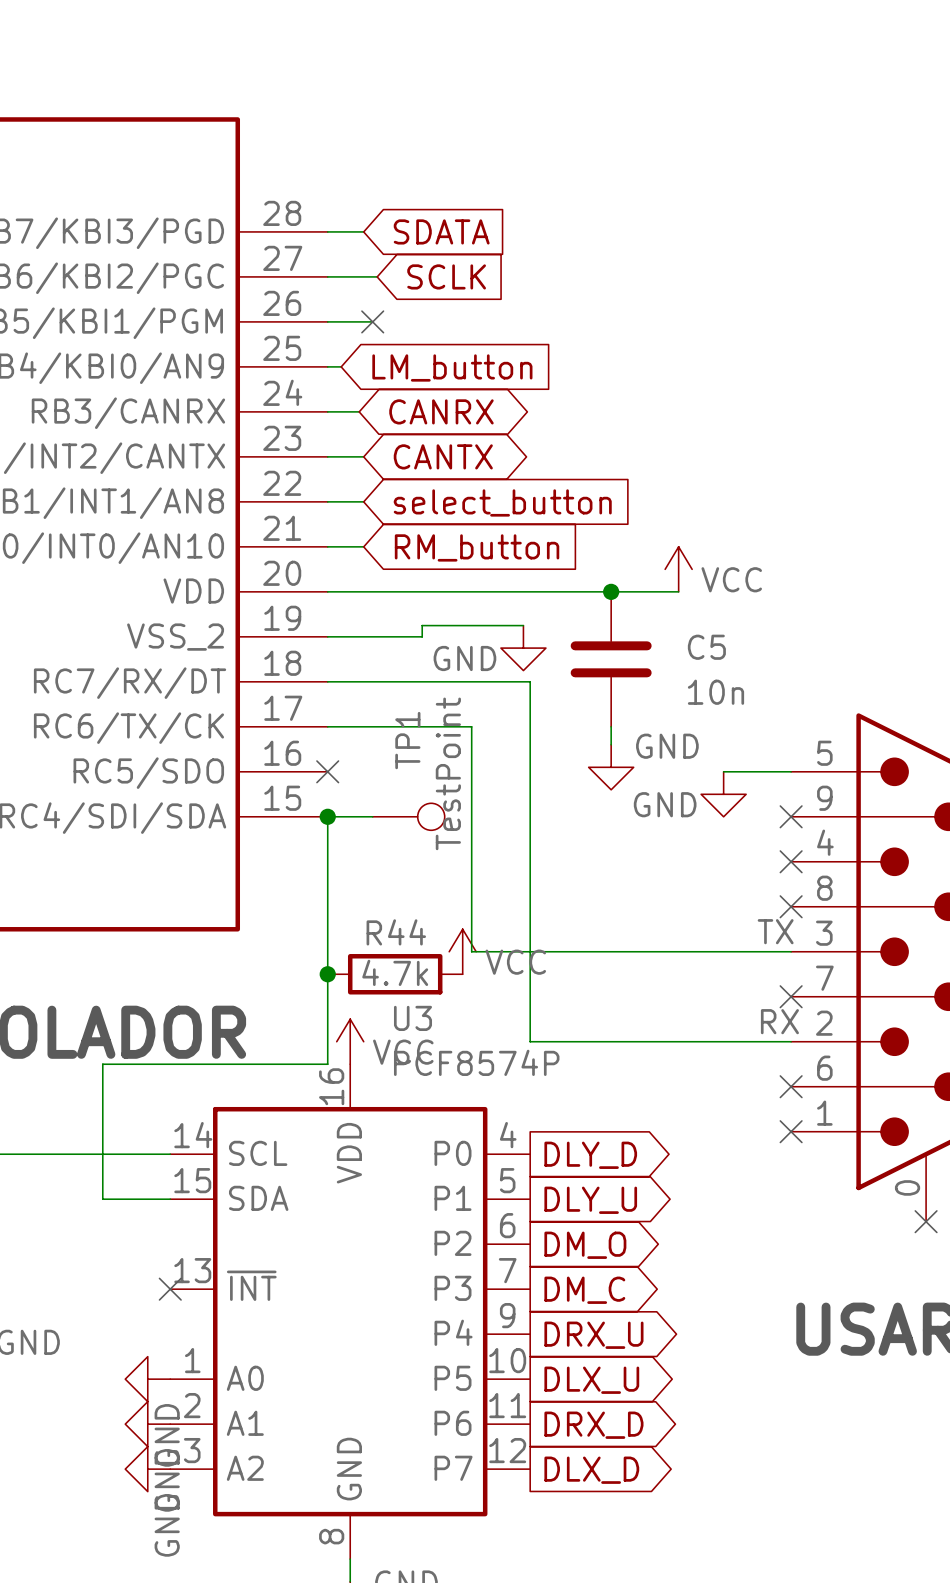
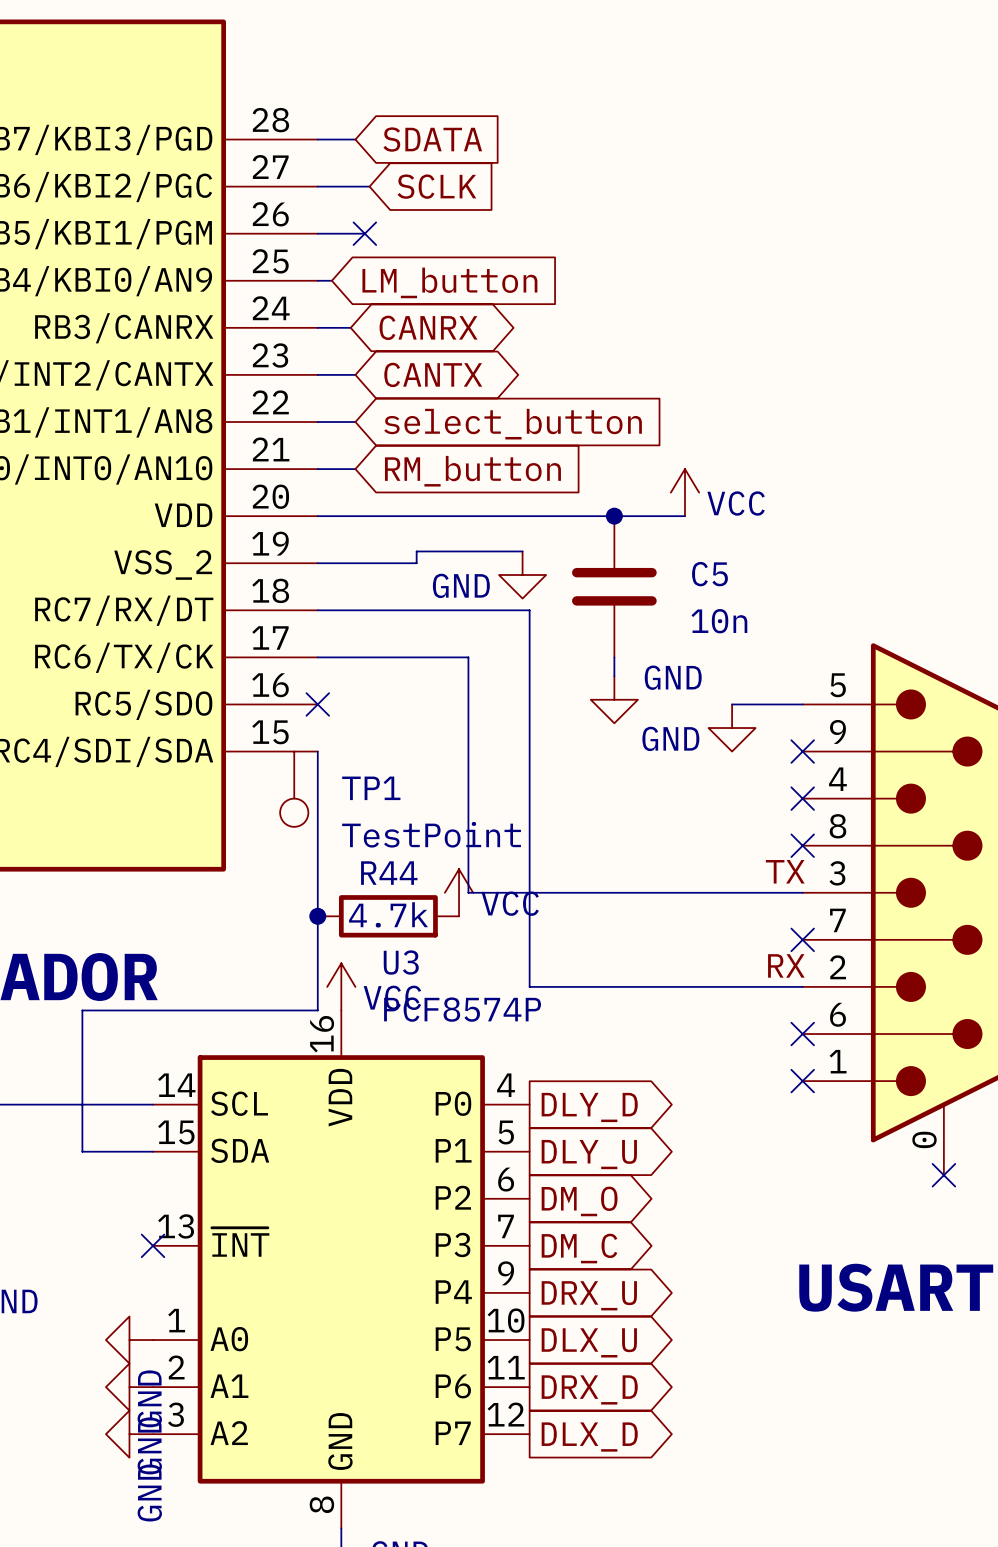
TP1 value position: TestPoint (448, 773) -> TestPoint (431, 834)
wire: (327, 816) (372, 816) -> none
junction: (327, 816) -> none
TP1 position: (408, 816) -> (294, 789)
TP1 rotation: 0° (431, 816) -> 90° clockwise (294, 812)

